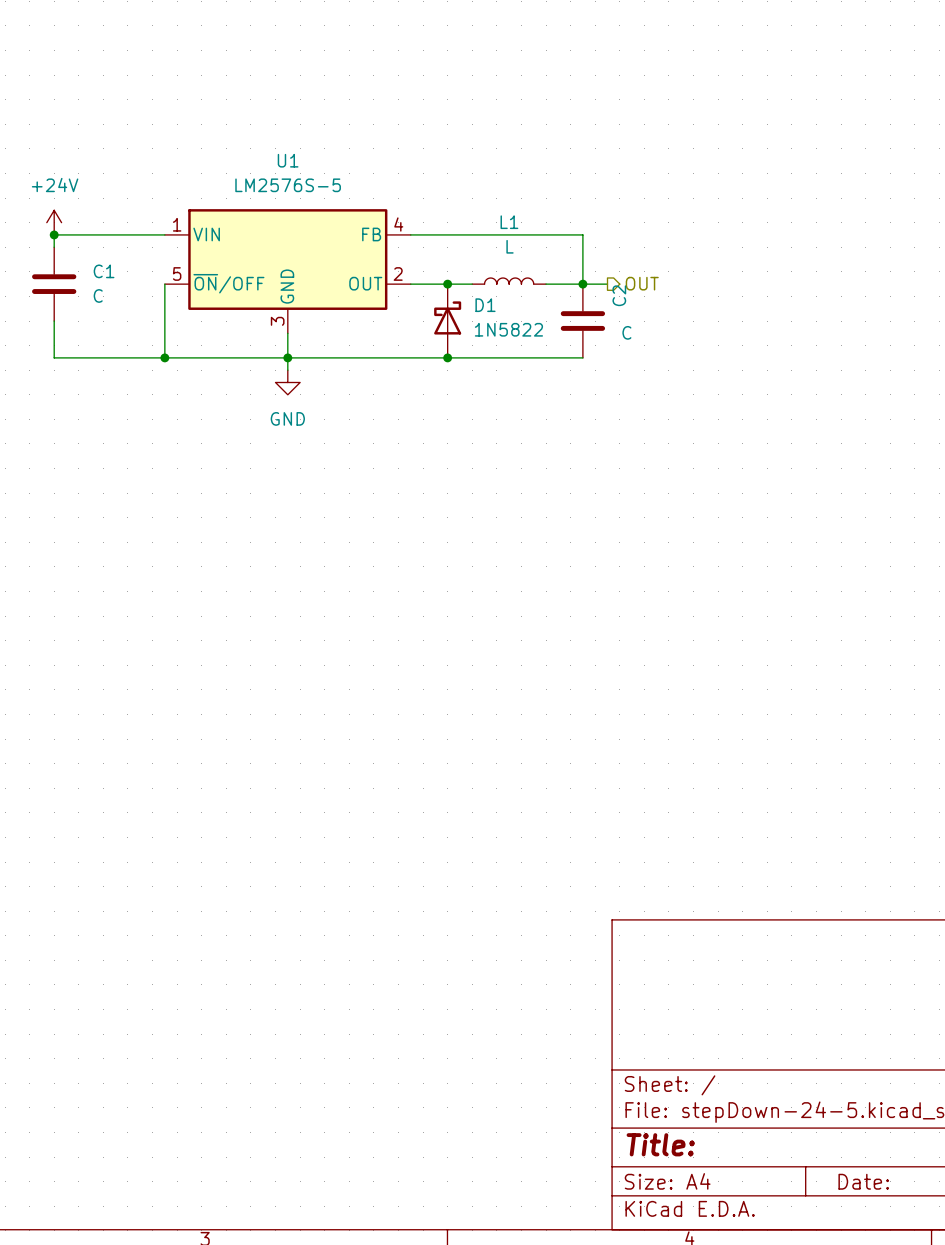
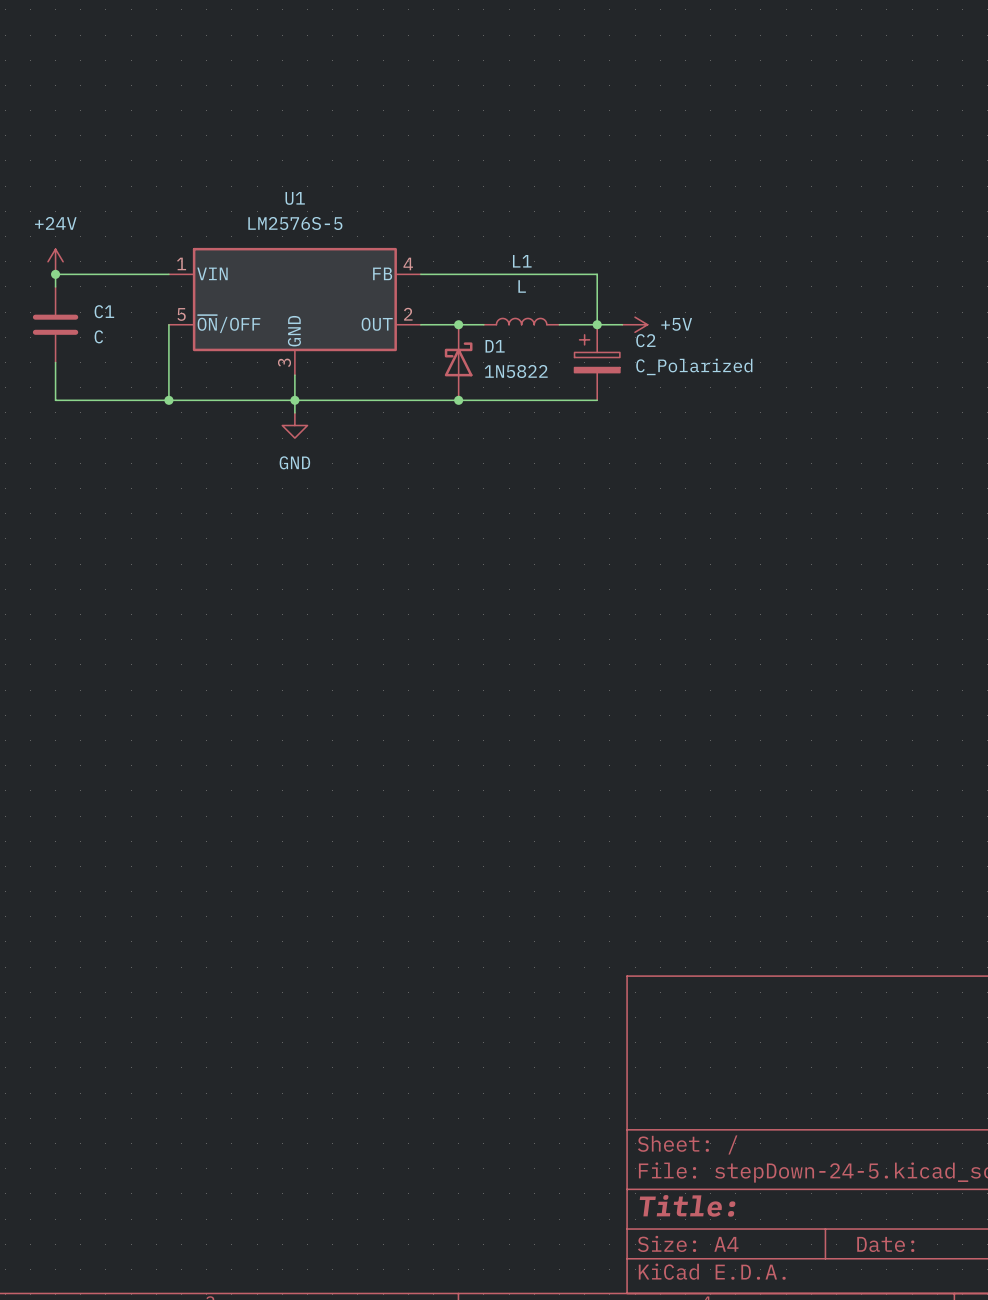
hierarchical label: OUT (642, 283) -> none
C2 symbol: [560, 284, 606, 358] -> [574, 324, 620, 401]
power symbol: none -> +5V (635, 324)
C2 value: C (626, 332) -> C_Polarized (694, 366)

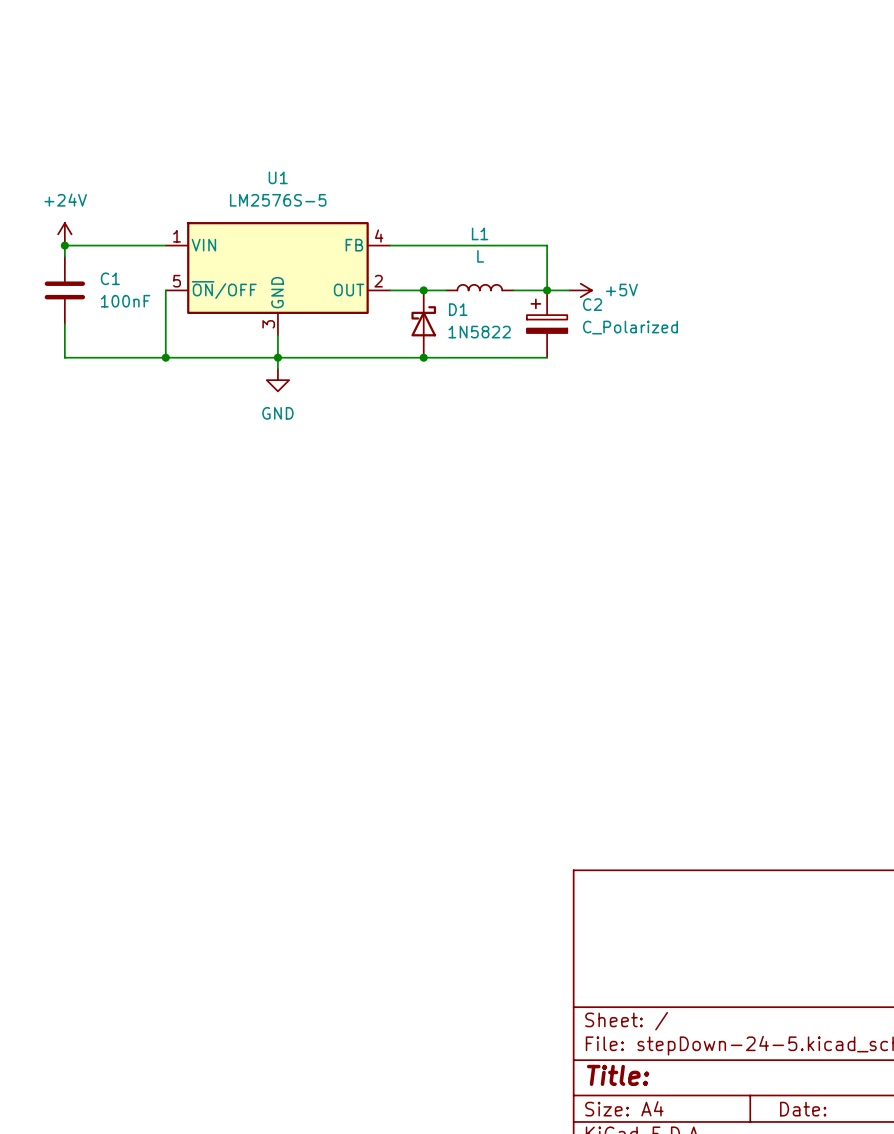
C1 value: C (98, 336) -> 100nF (125, 301)

